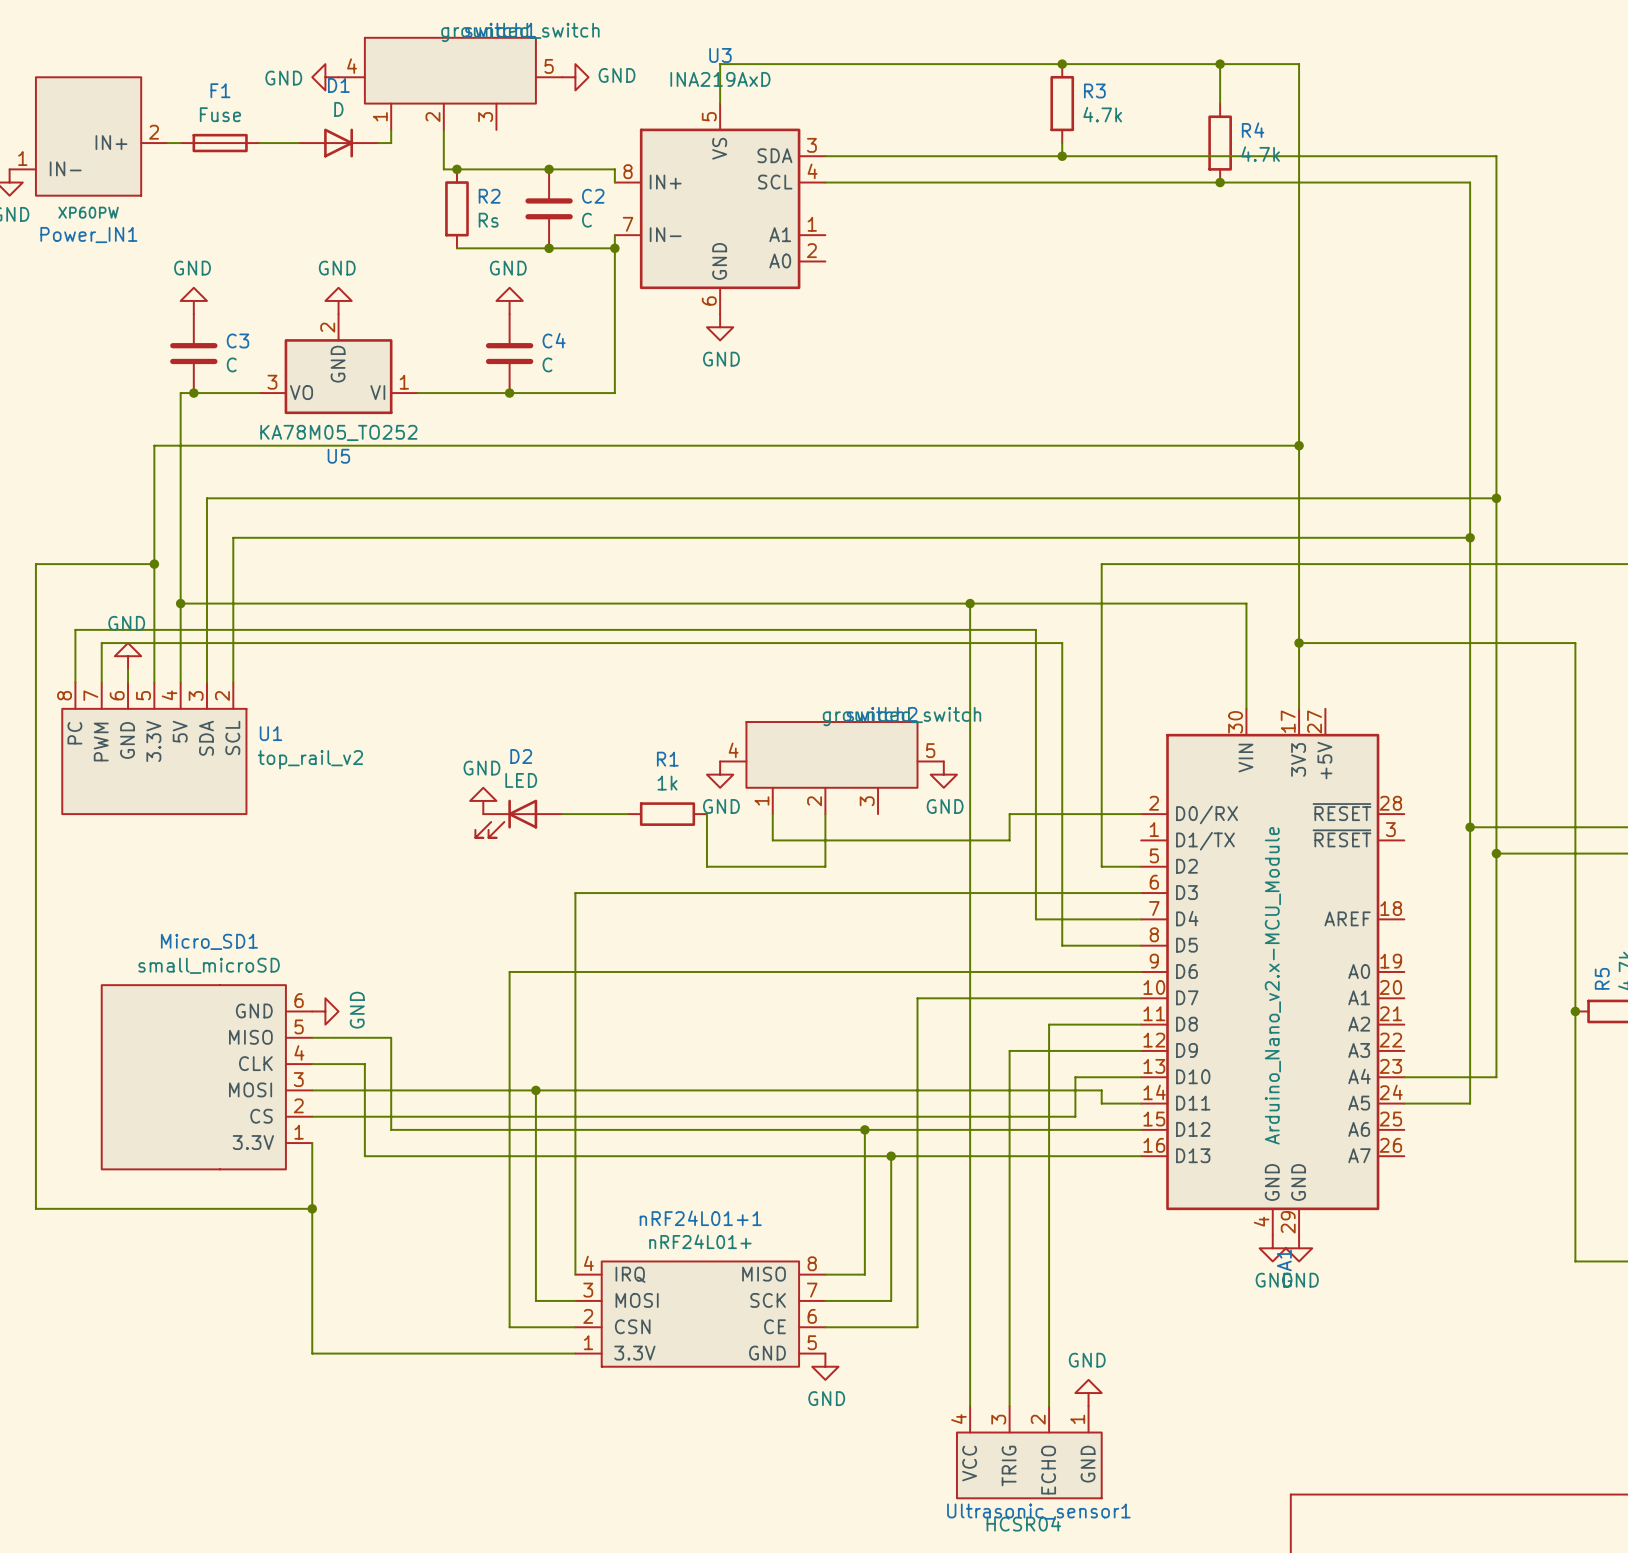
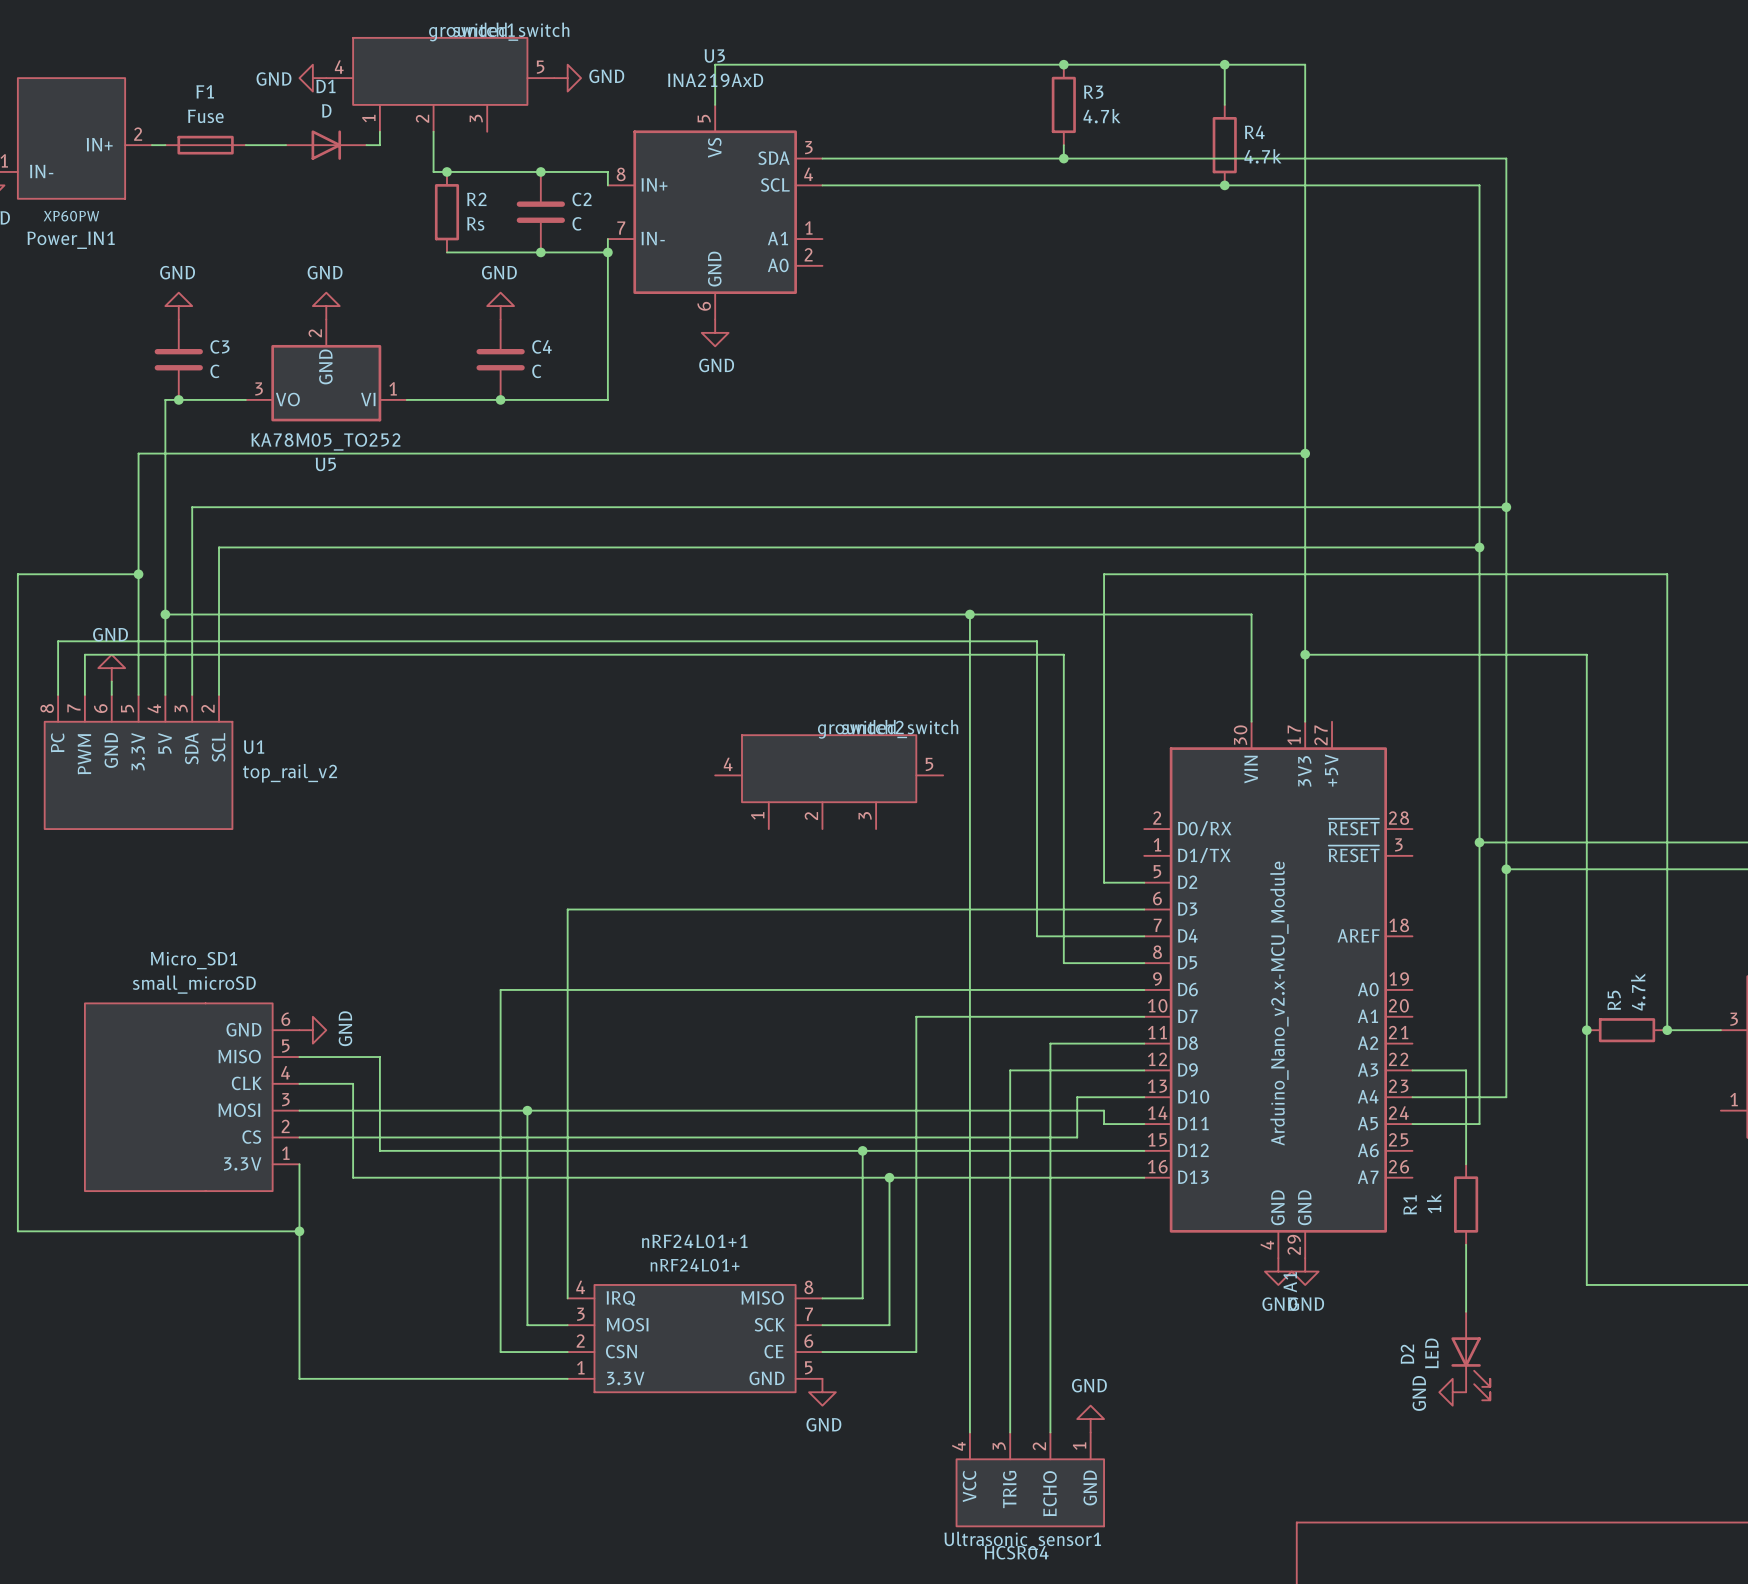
R1 name position: R1 (667, 759) -> R1 (1410, 1204)
power symbol: GND (720, 774) -> none
power symbol: GND (943, 774) -> none
R1 value position: 1k (667, 783) -> 1k (1434, 1203)
power symbol: GND (483, 800) -> none
wire: (562, 814) (628, 814) -> none
R1 rotation: 0° (667, 814) -> 90° clockwise (1466, 1204)
R1 position: (667, 814) -> (1466, 1204)
wire: (706, 814) (706, 866) (825, 866) (825, 814) -> none
wire: (772, 814) (772, 840) (1009, 840) (1009, 814) (1141, 814) -> none
D2 rotation: 0° (506, 818) -> 90° counterclockwise (1470, 1368)
D2 position: (518, 818) -> (1470, 1356)
wire: none -> (1412, 1070) (1466, 1070) (1466, 1164)
wire: none -> (1466, 1244) (1466, 1311)
power symbol: none -> GND (1452, 1392)

